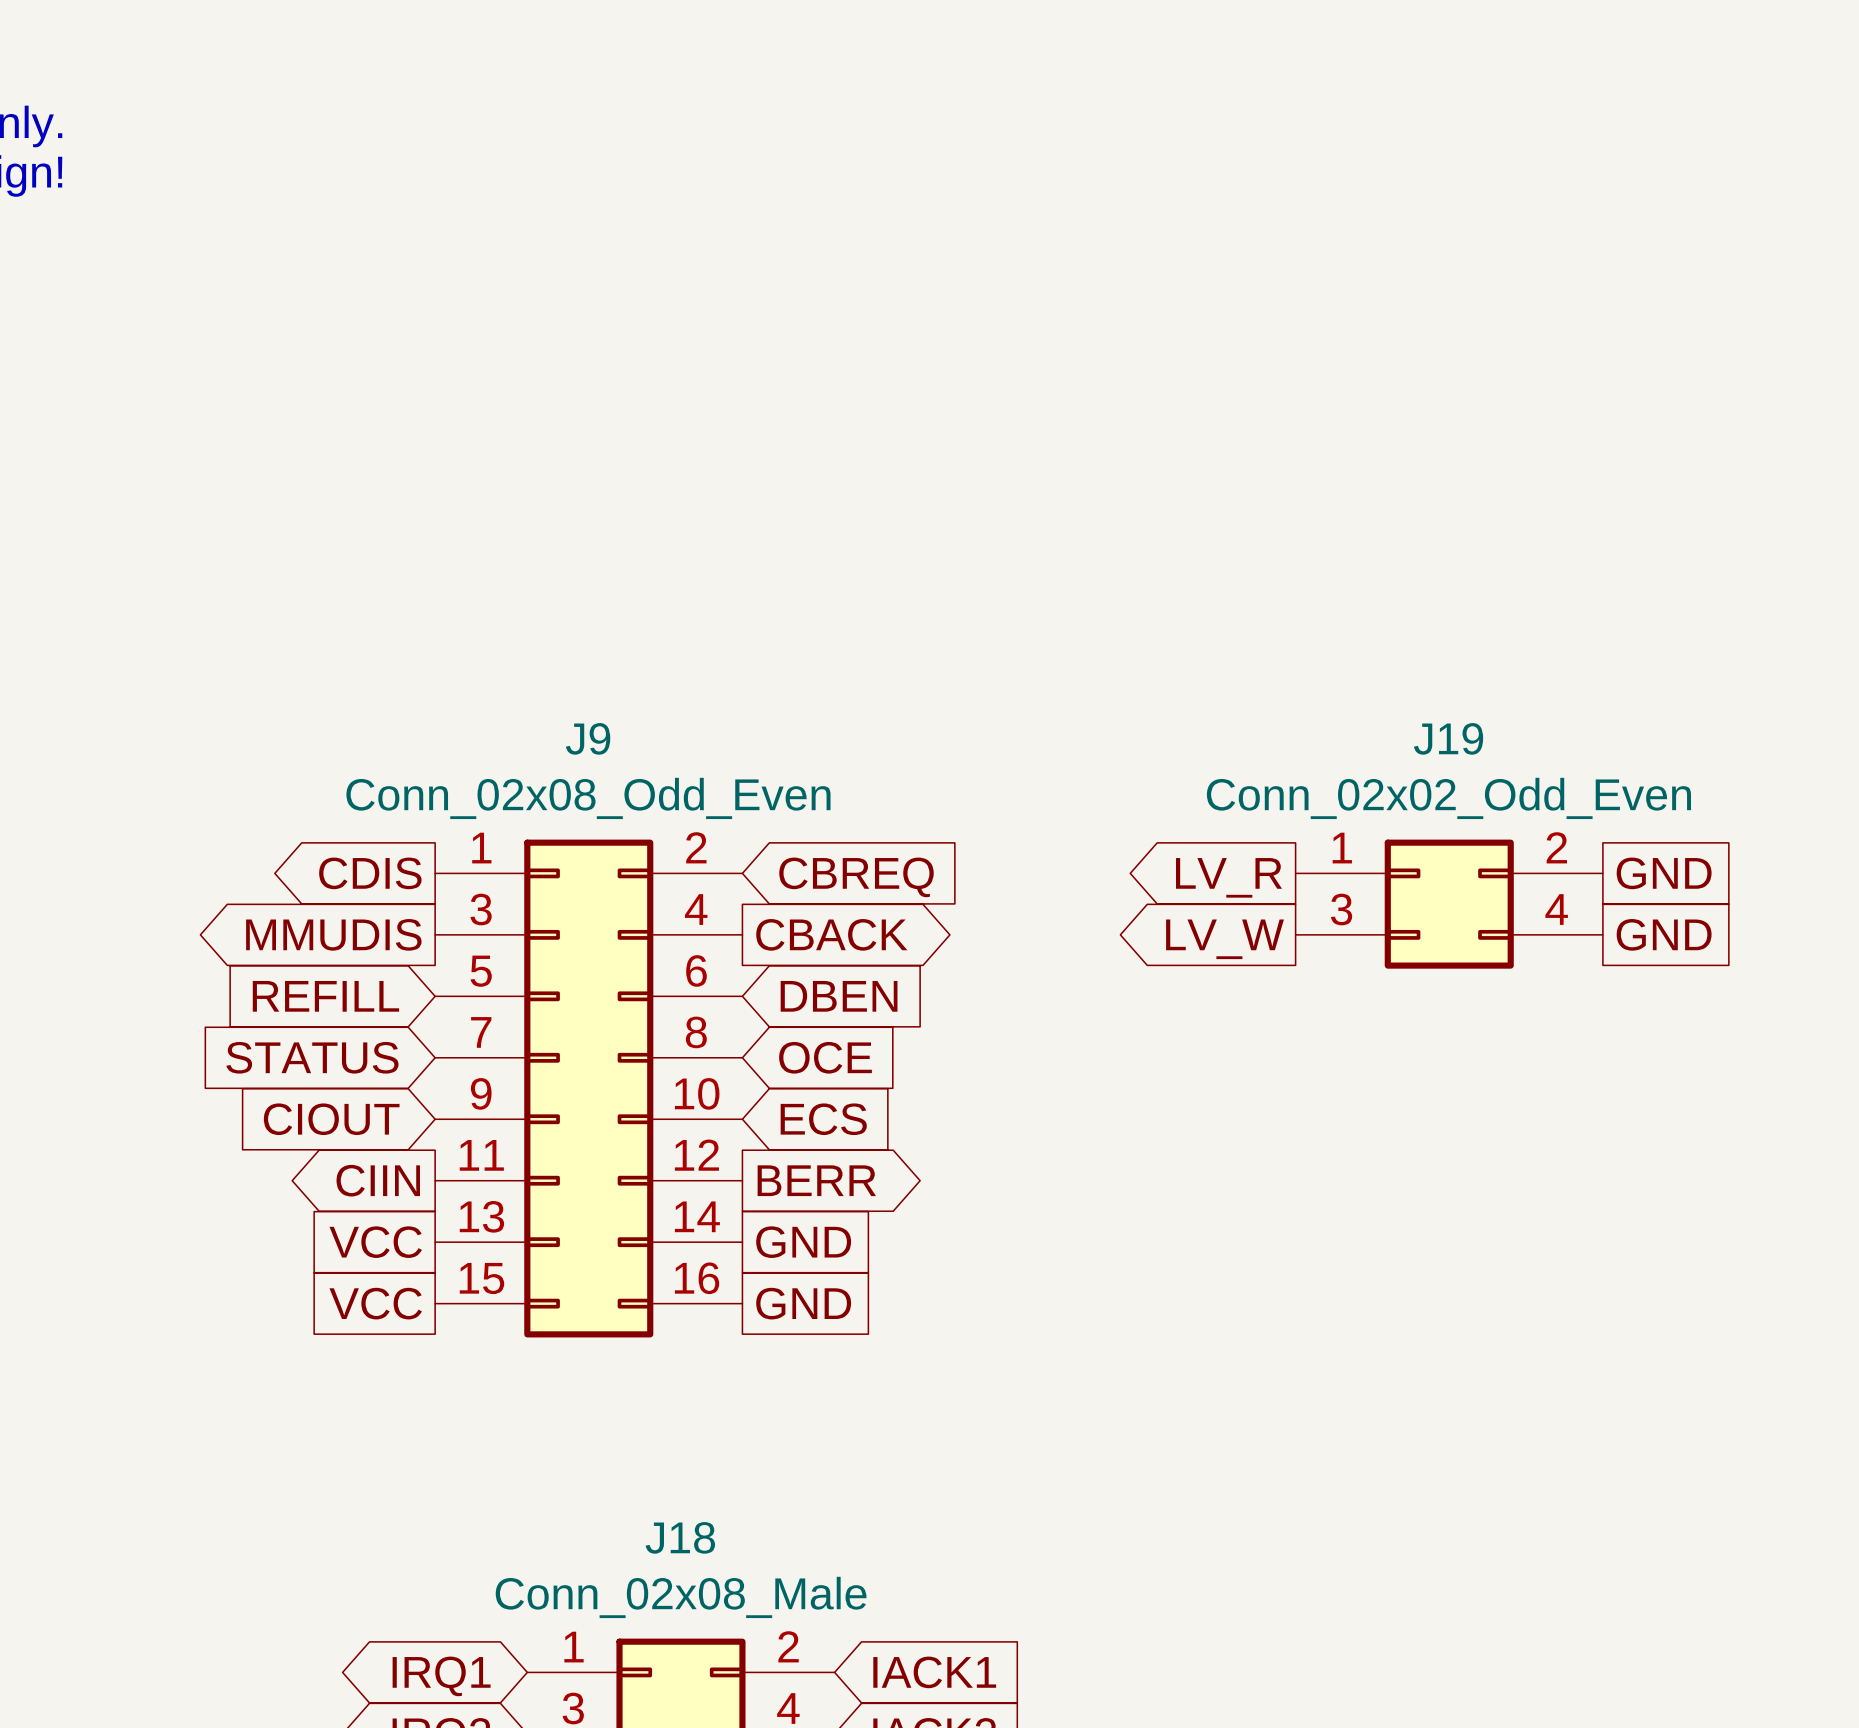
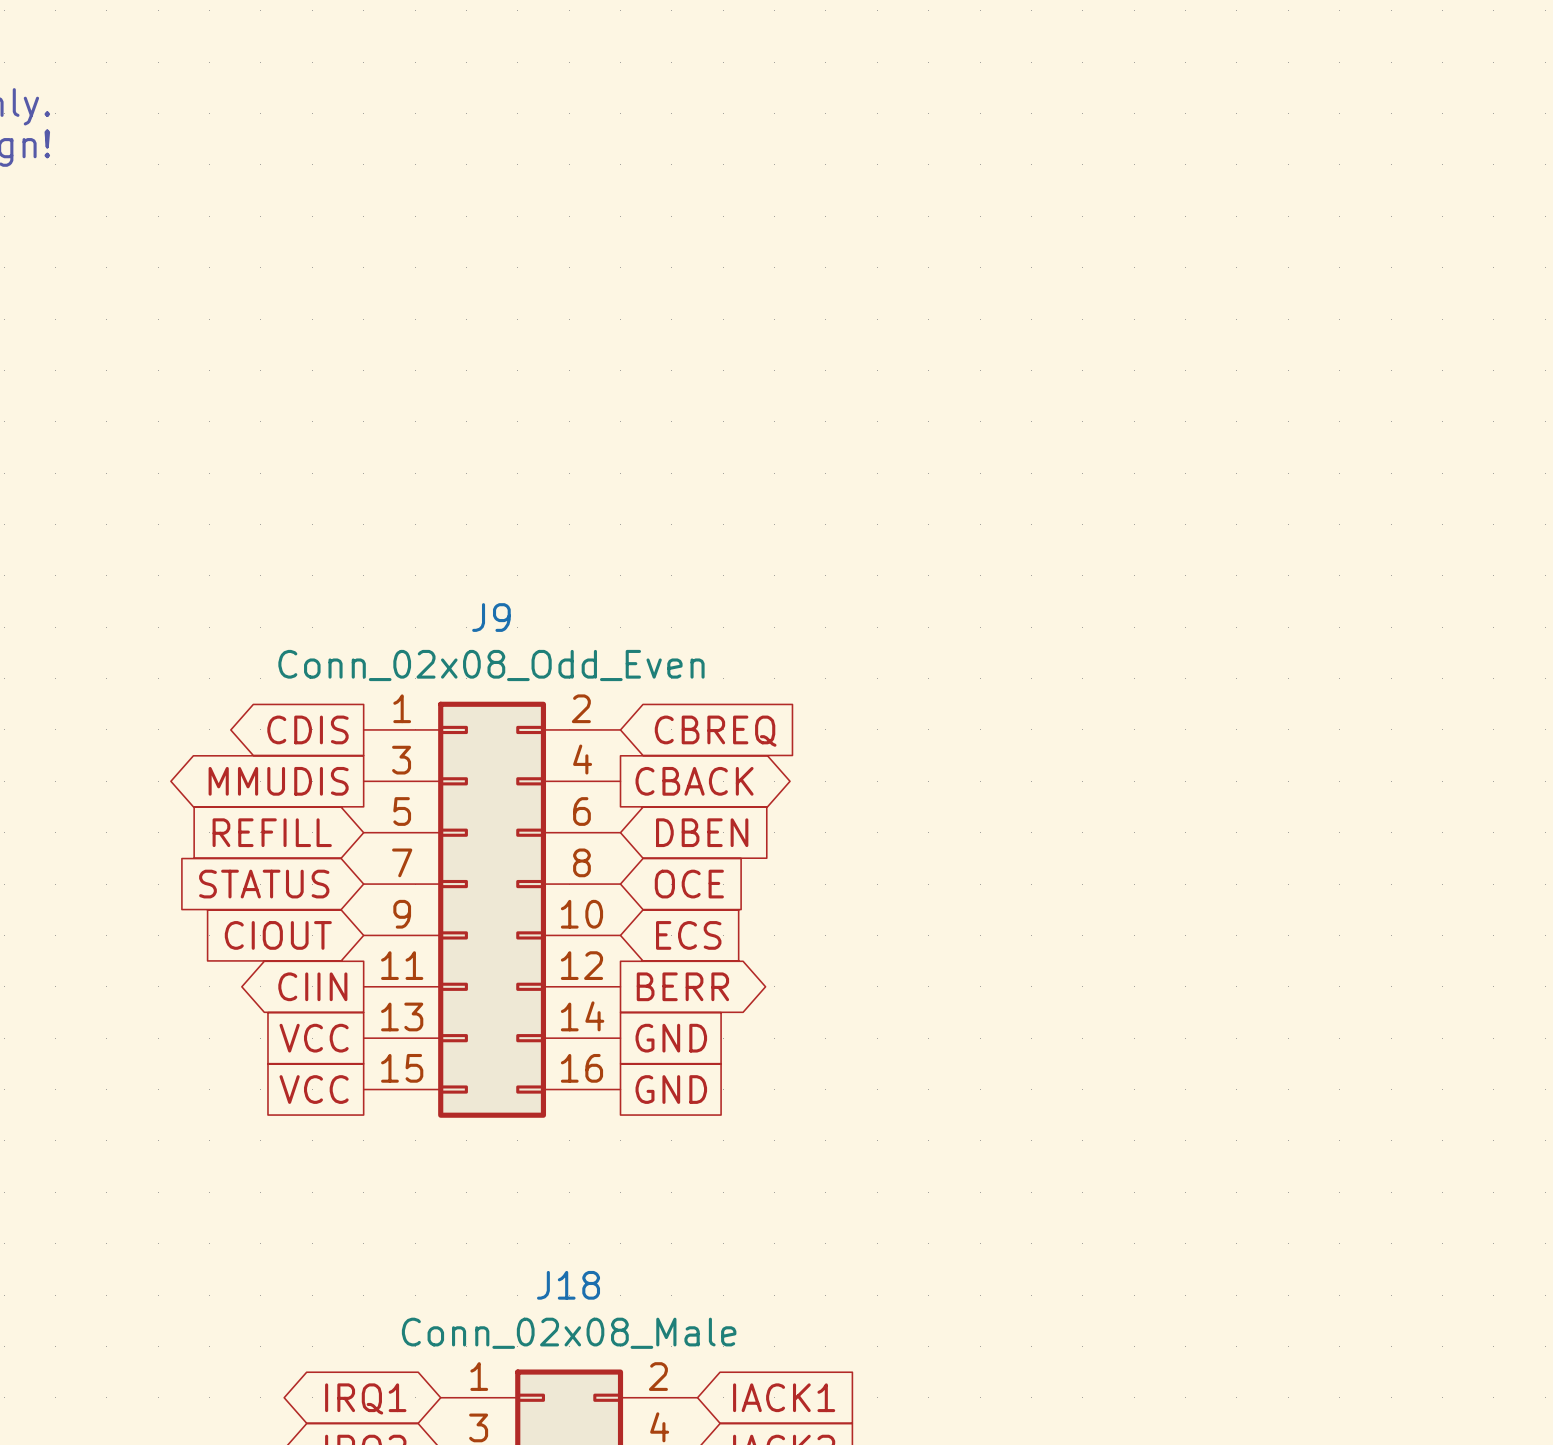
global label: GND (1664, 873) -> none
global label: LV_R (1229, 877) -> none
J19: Conn_02x02_Odd_Even (1449, 904) -> none
global label: GND (1664, 934) -> none
global label: LV_W (1225, 939) -> none

